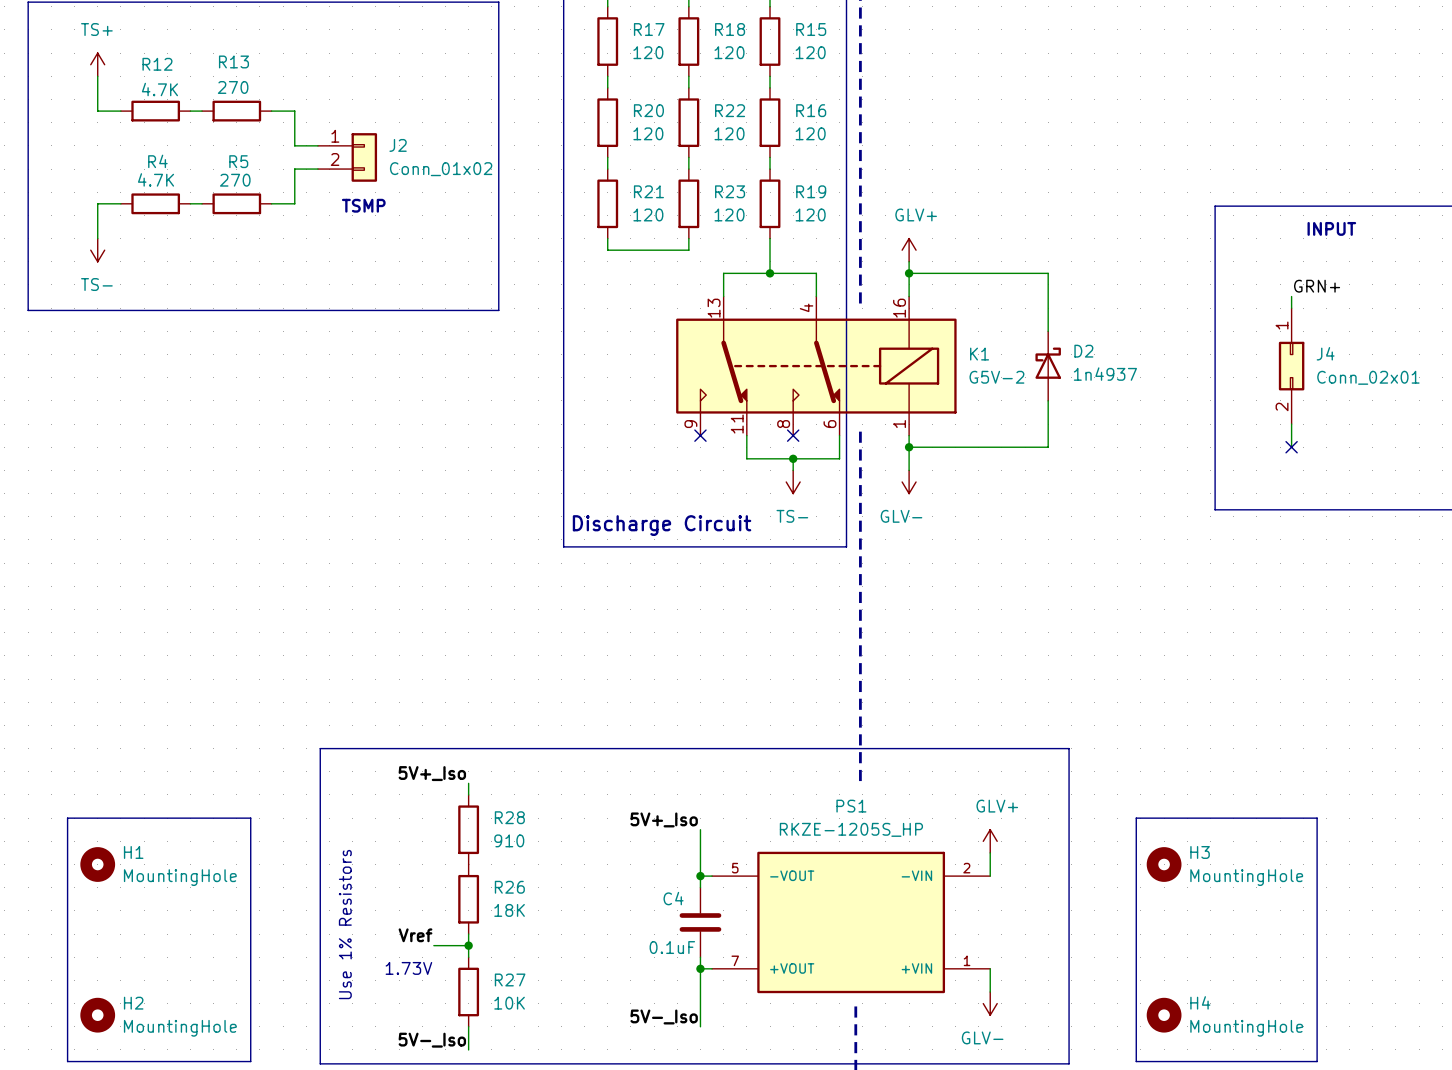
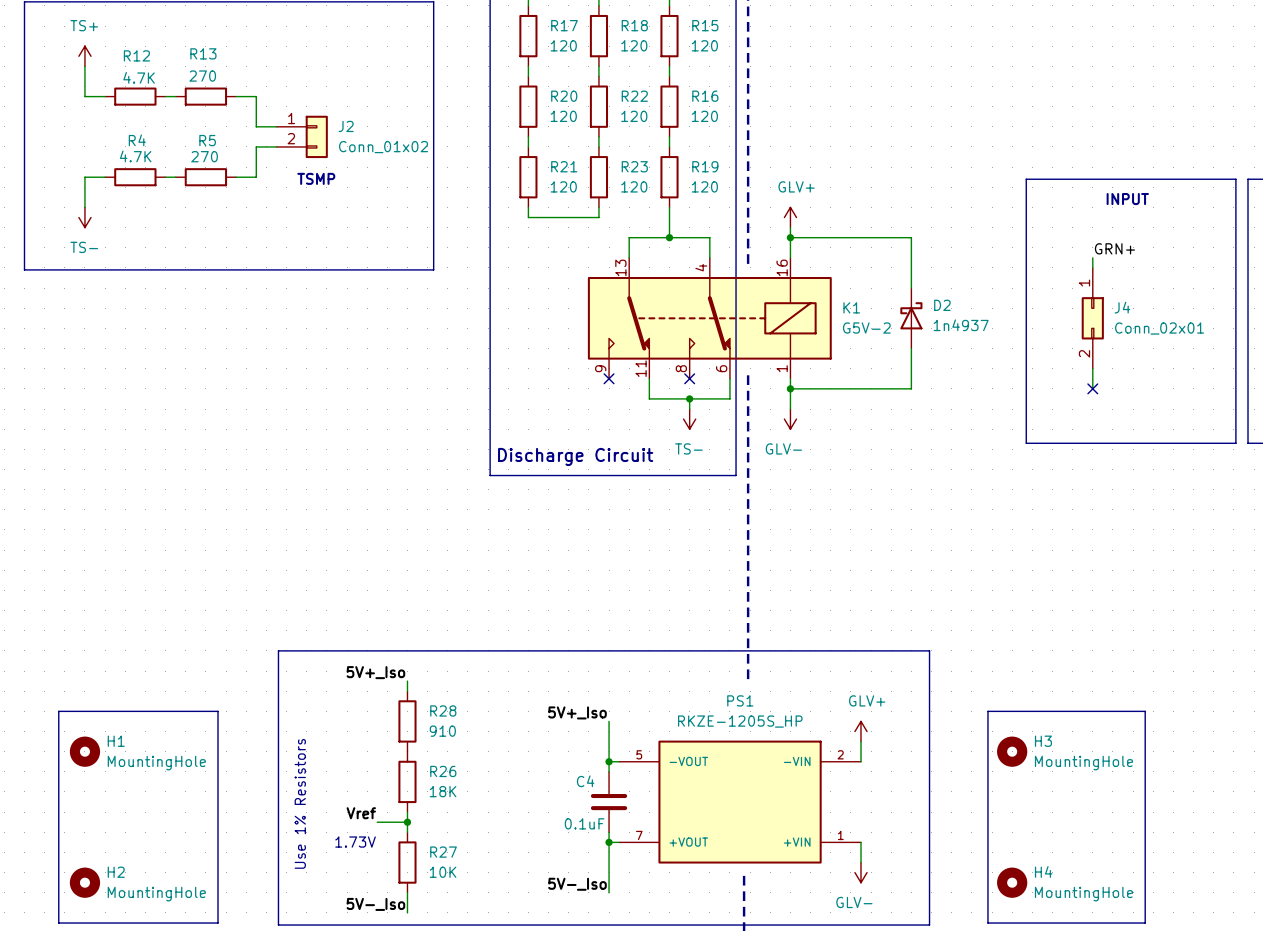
line: (1215, 206) (1215, 509) -> (1056, 179) (1026, 179) (1026, 443) (1056, 443)
line: (1421, 206) (1435, 206) -> (1235, 179) (1235, 443)
text position: INPUT (1331, 228) -> INPUT (1127, 199)
label position: GRN+ (1317, 286) -> GRN+ (1114, 248)
wire: (1291, 296) (1291, 308) -> (1092, 257) (1092, 267)
J4 position: (1291, 366) -> (1092, 318)
wire: (1291, 424) (1291, 447) -> (1092, 368) (1092, 388)
no-connect mark position: (1291, 447) -> (1092, 388)
line: (1421, 509) (1435, 509) -> (1248, 179) (1248, 443)

